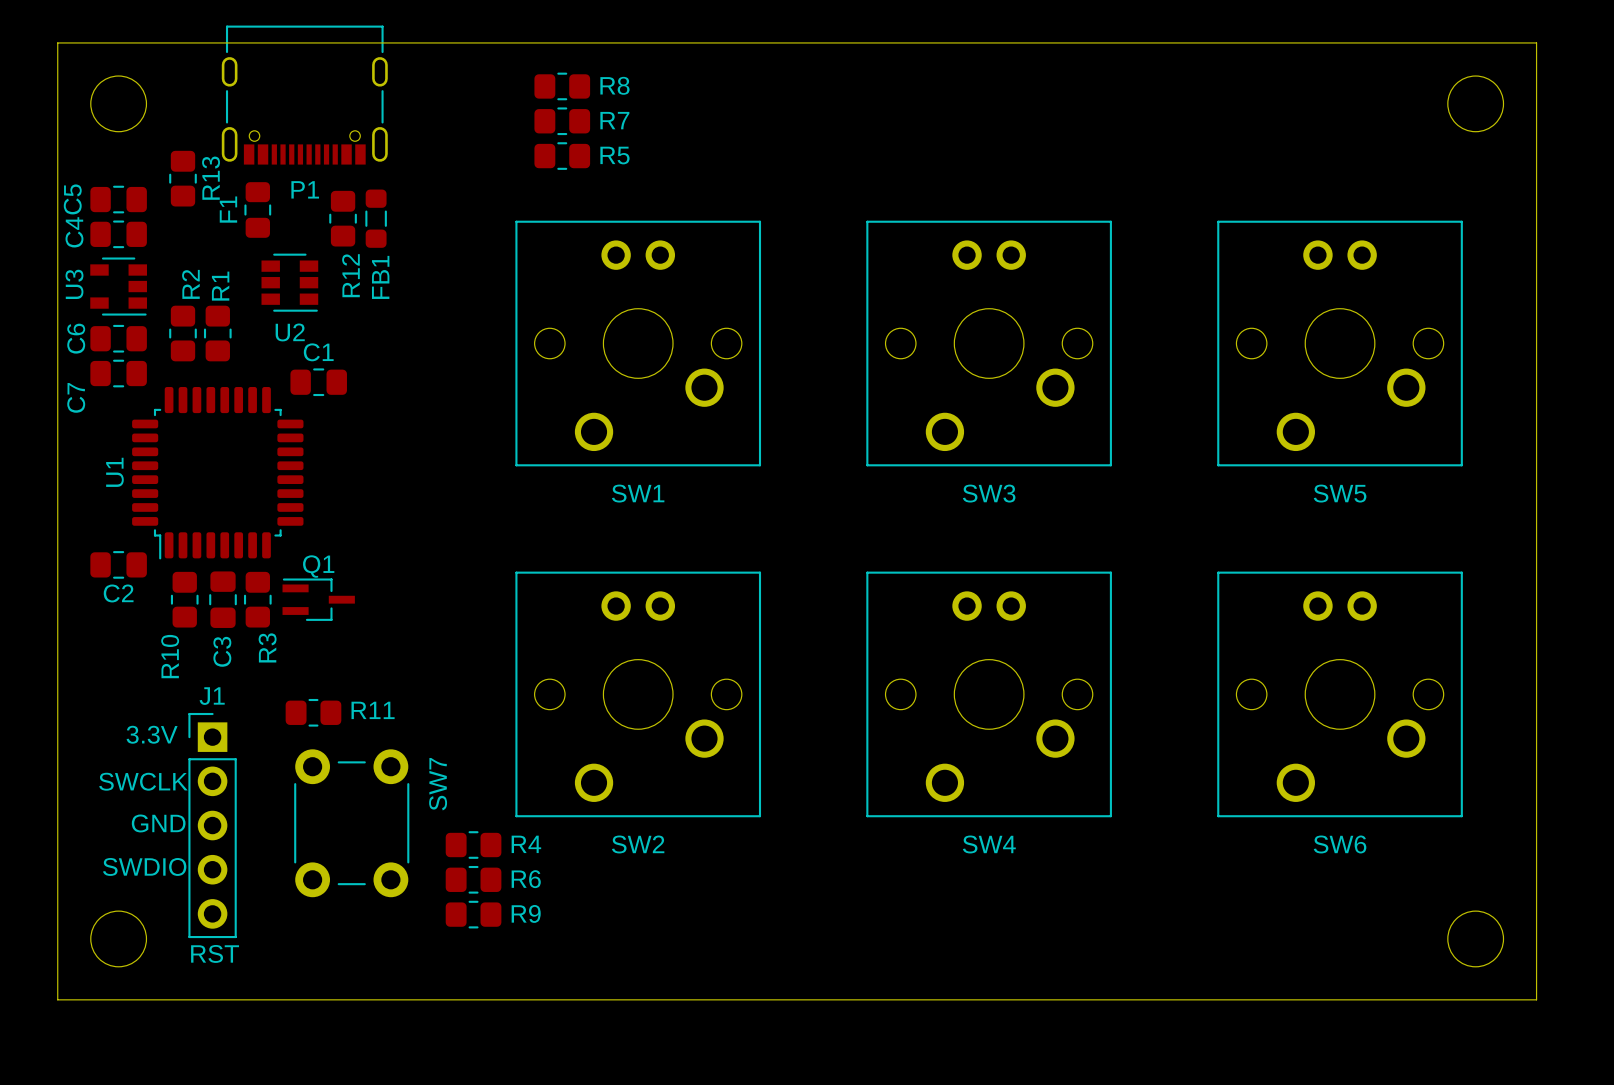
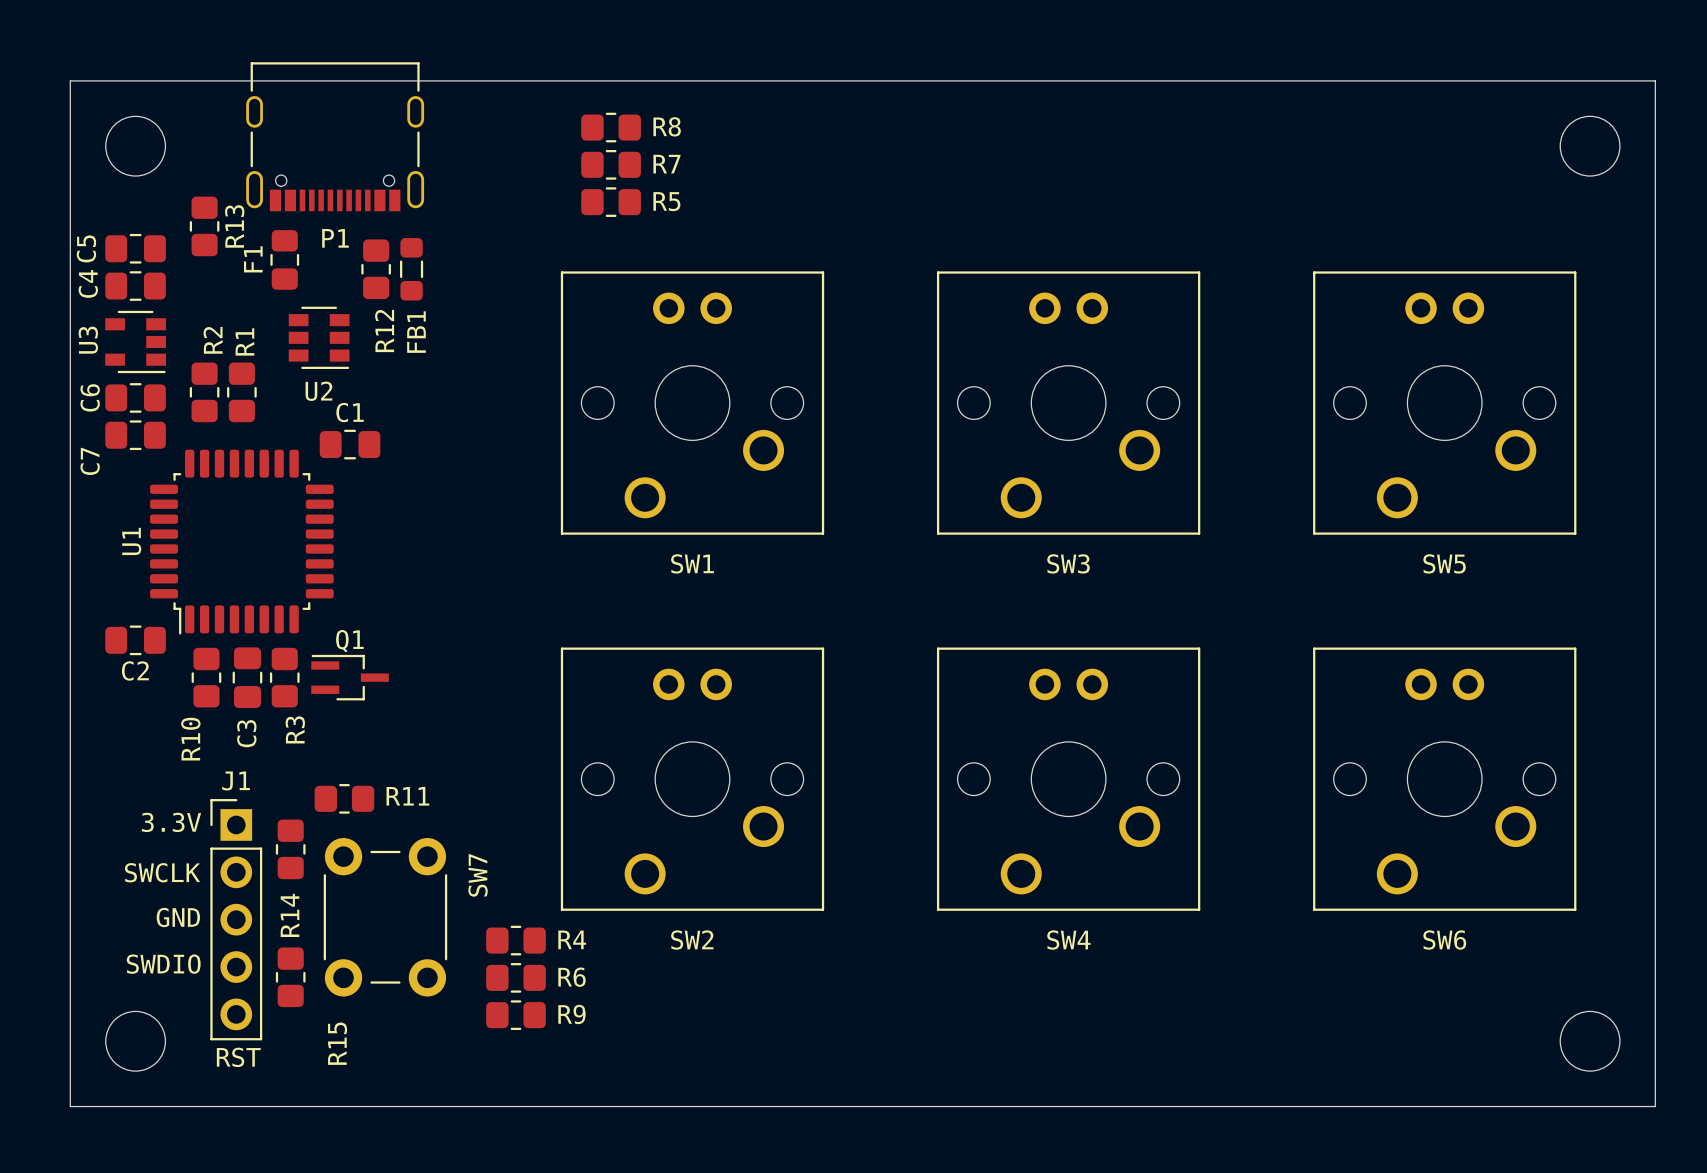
R14: none -> (290, 849)
R15: none -> (290, 977)

